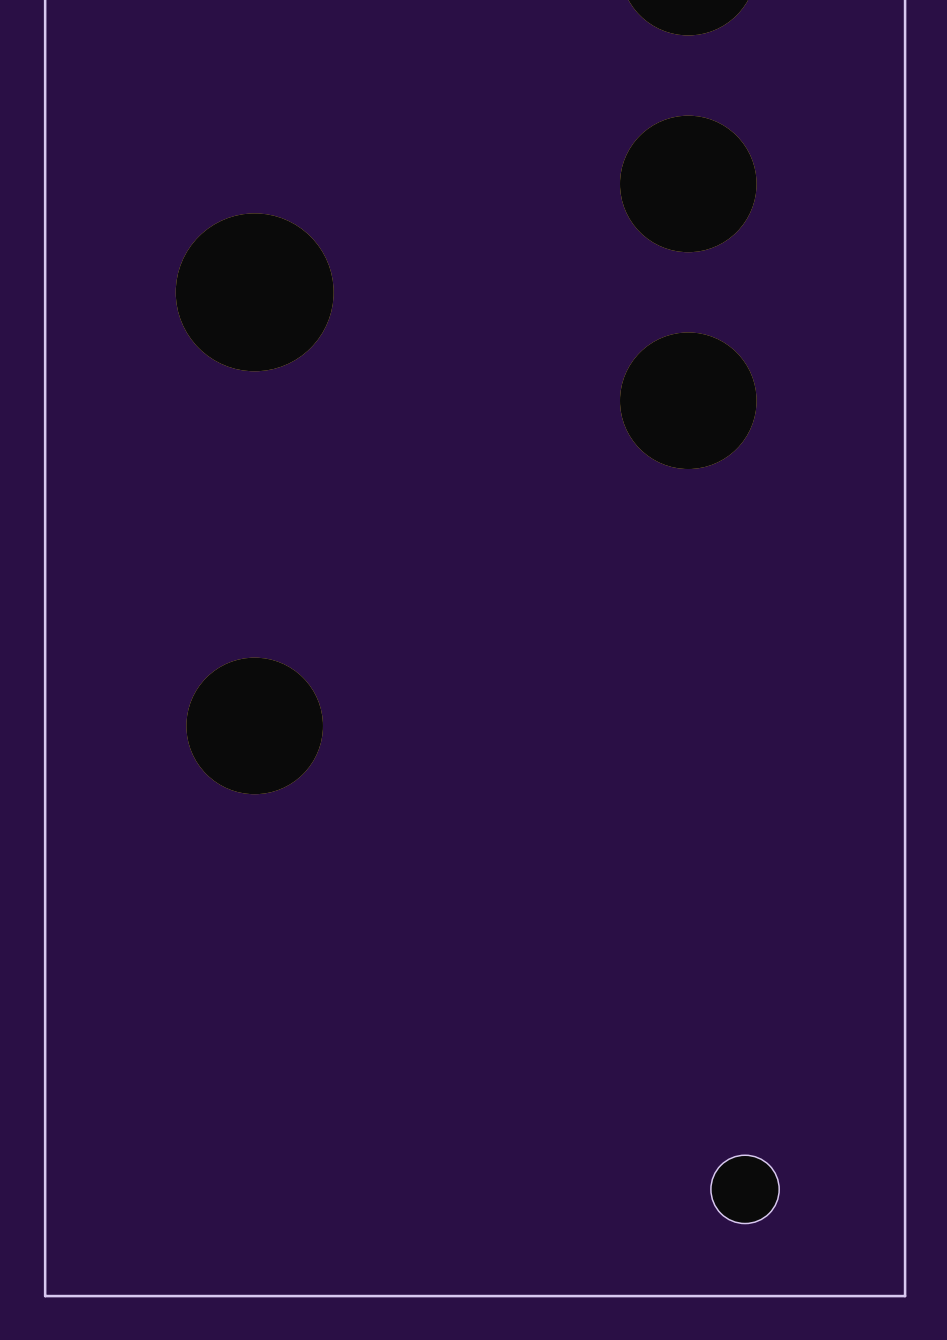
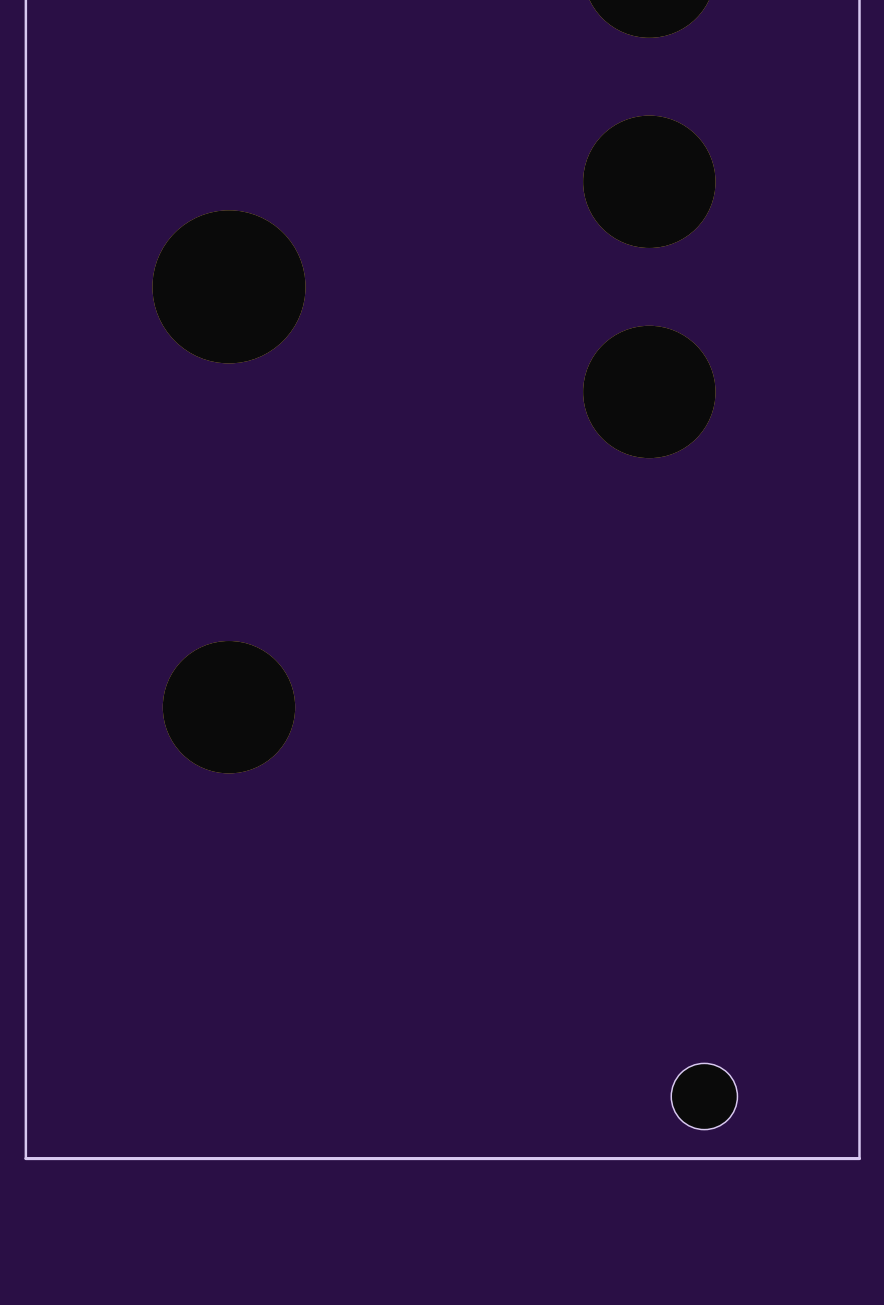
part position: (745, 1189) -> (704, 1096)
board edge: (905, 1191) (905, 1296) (45, 1296) (45, 1191) -> (859, 1158) (25, 1158)

